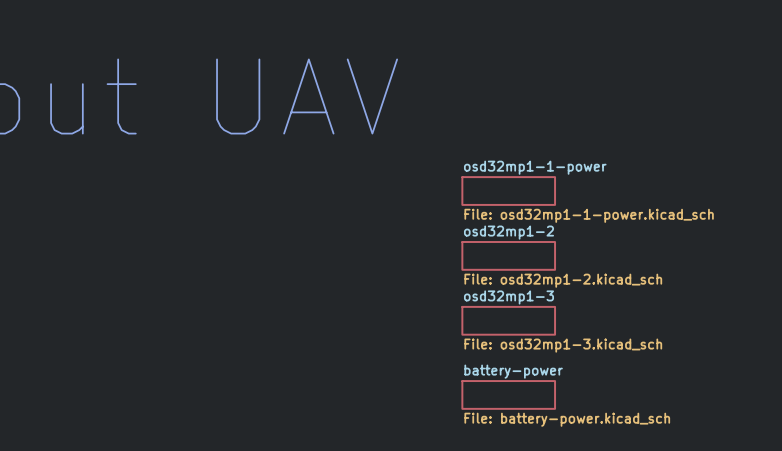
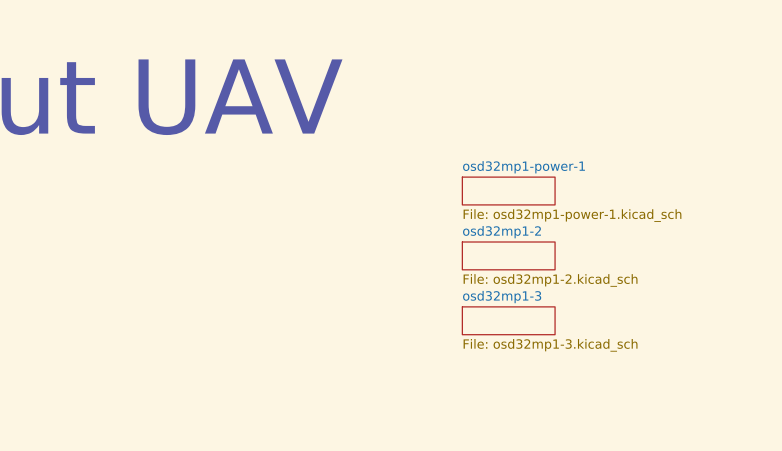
sheet osd32mp1-1-power name: osd32mp1-1-power (535, 167) -> osd32mp1-power-1 (524, 167)
sheet osd32mp1-1-power value: File: osd32mp1-1-power.kicad_sch (589, 215) -> File: osd32mp1-power-1.kicad_sch (572, 215)
sheet battery-power: File: battery-power.kicad_sch (508, 394) -> none

